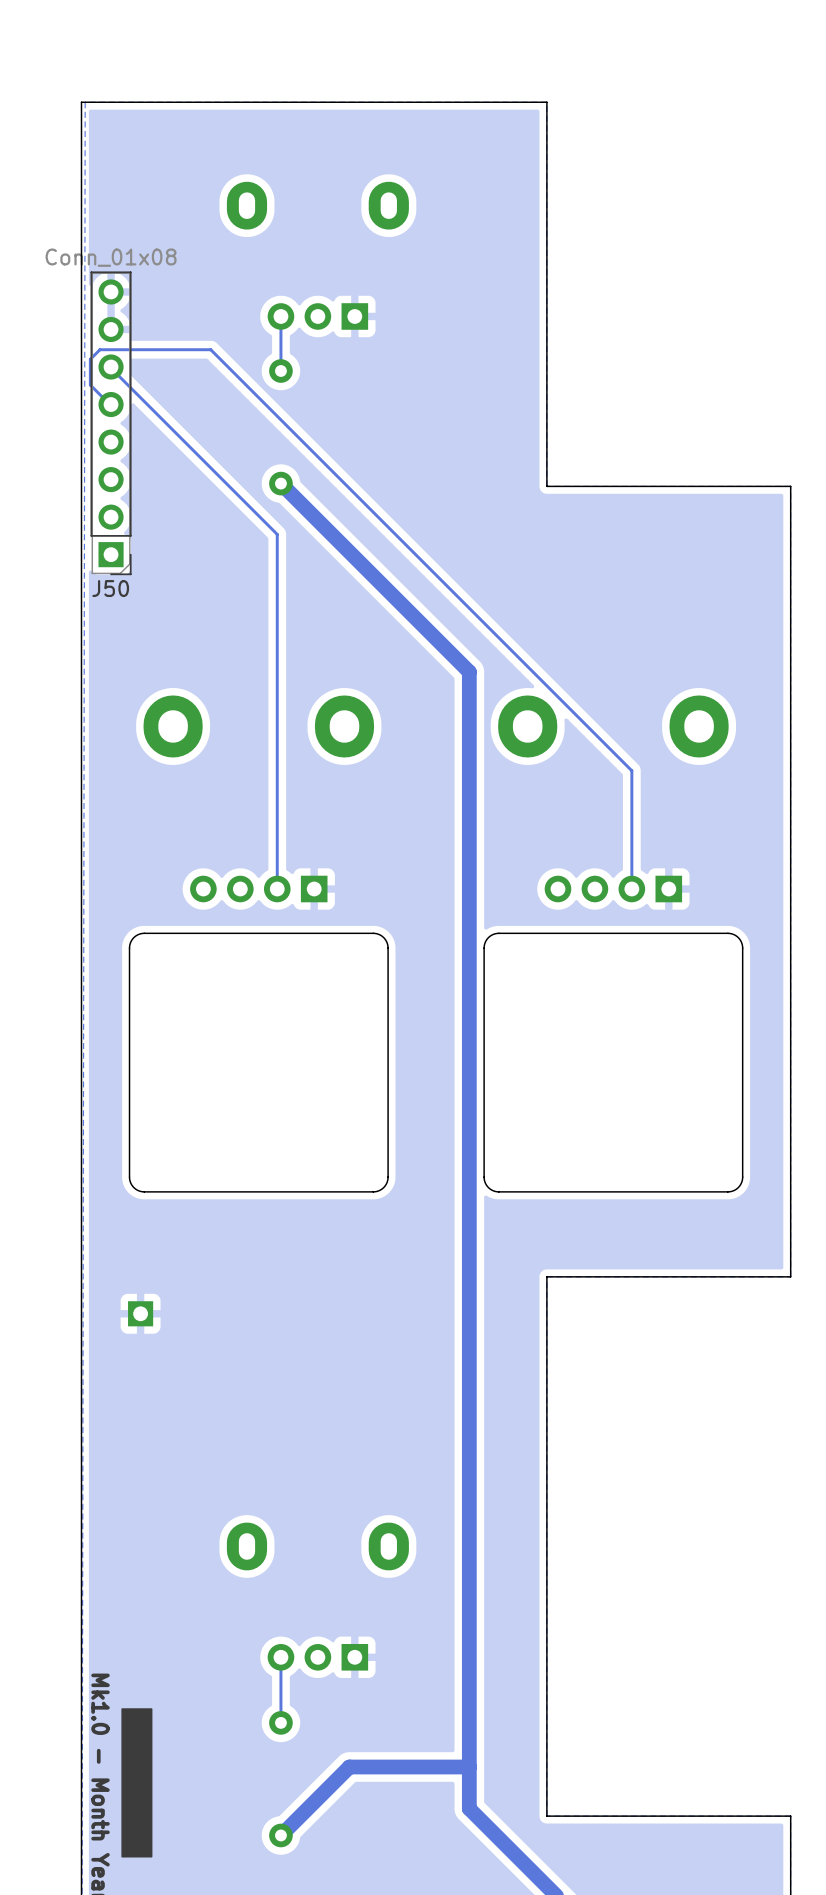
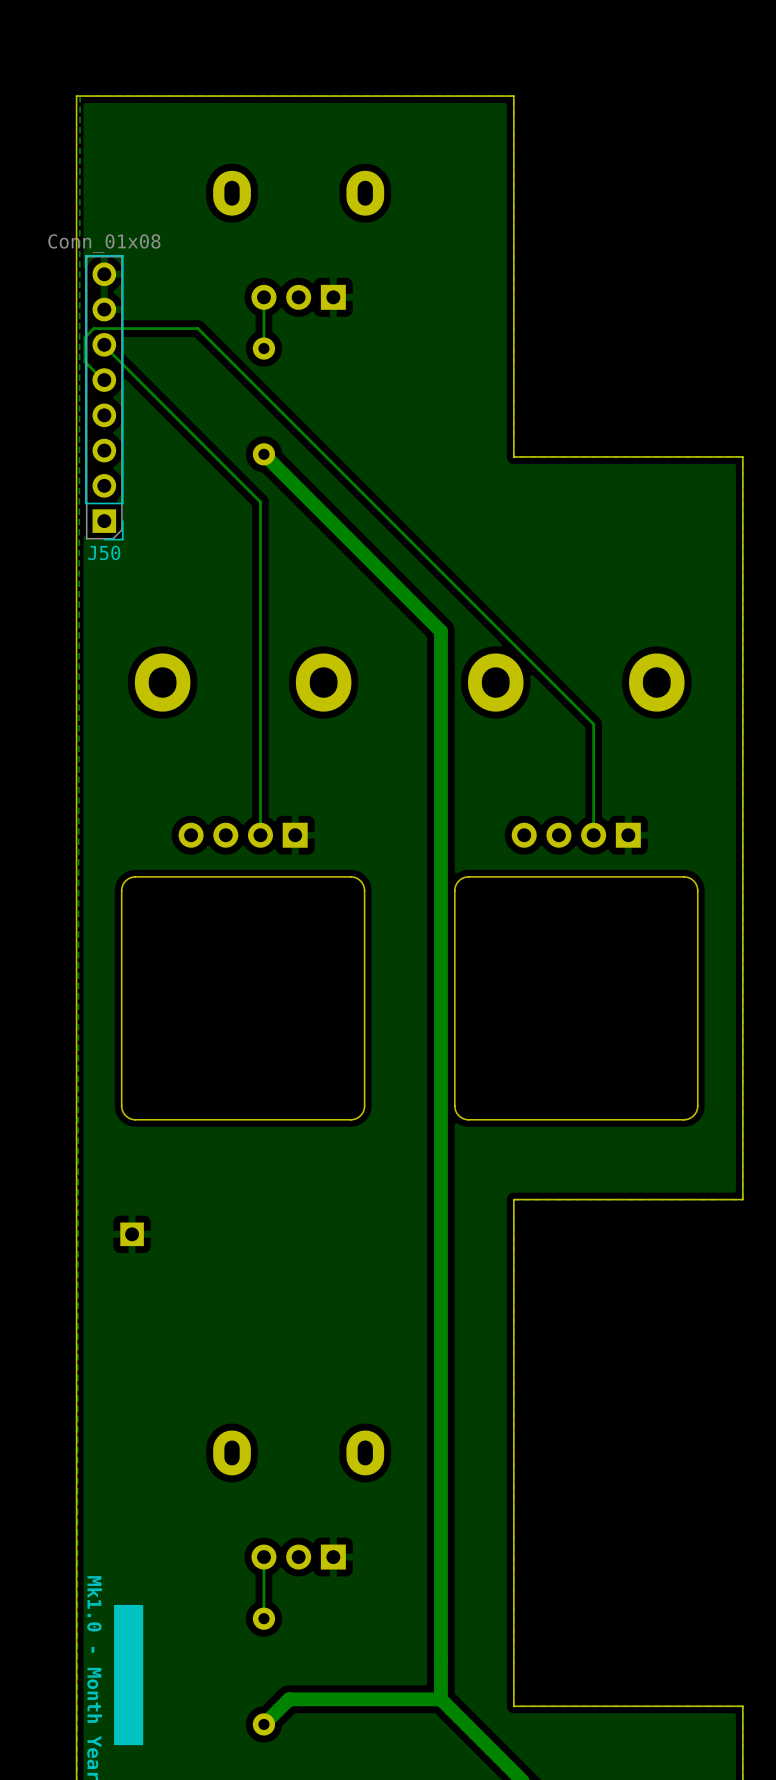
track: (469, 1767) (349, 1767) (307, 1808) -> (440, 1699) (289, 1699)

